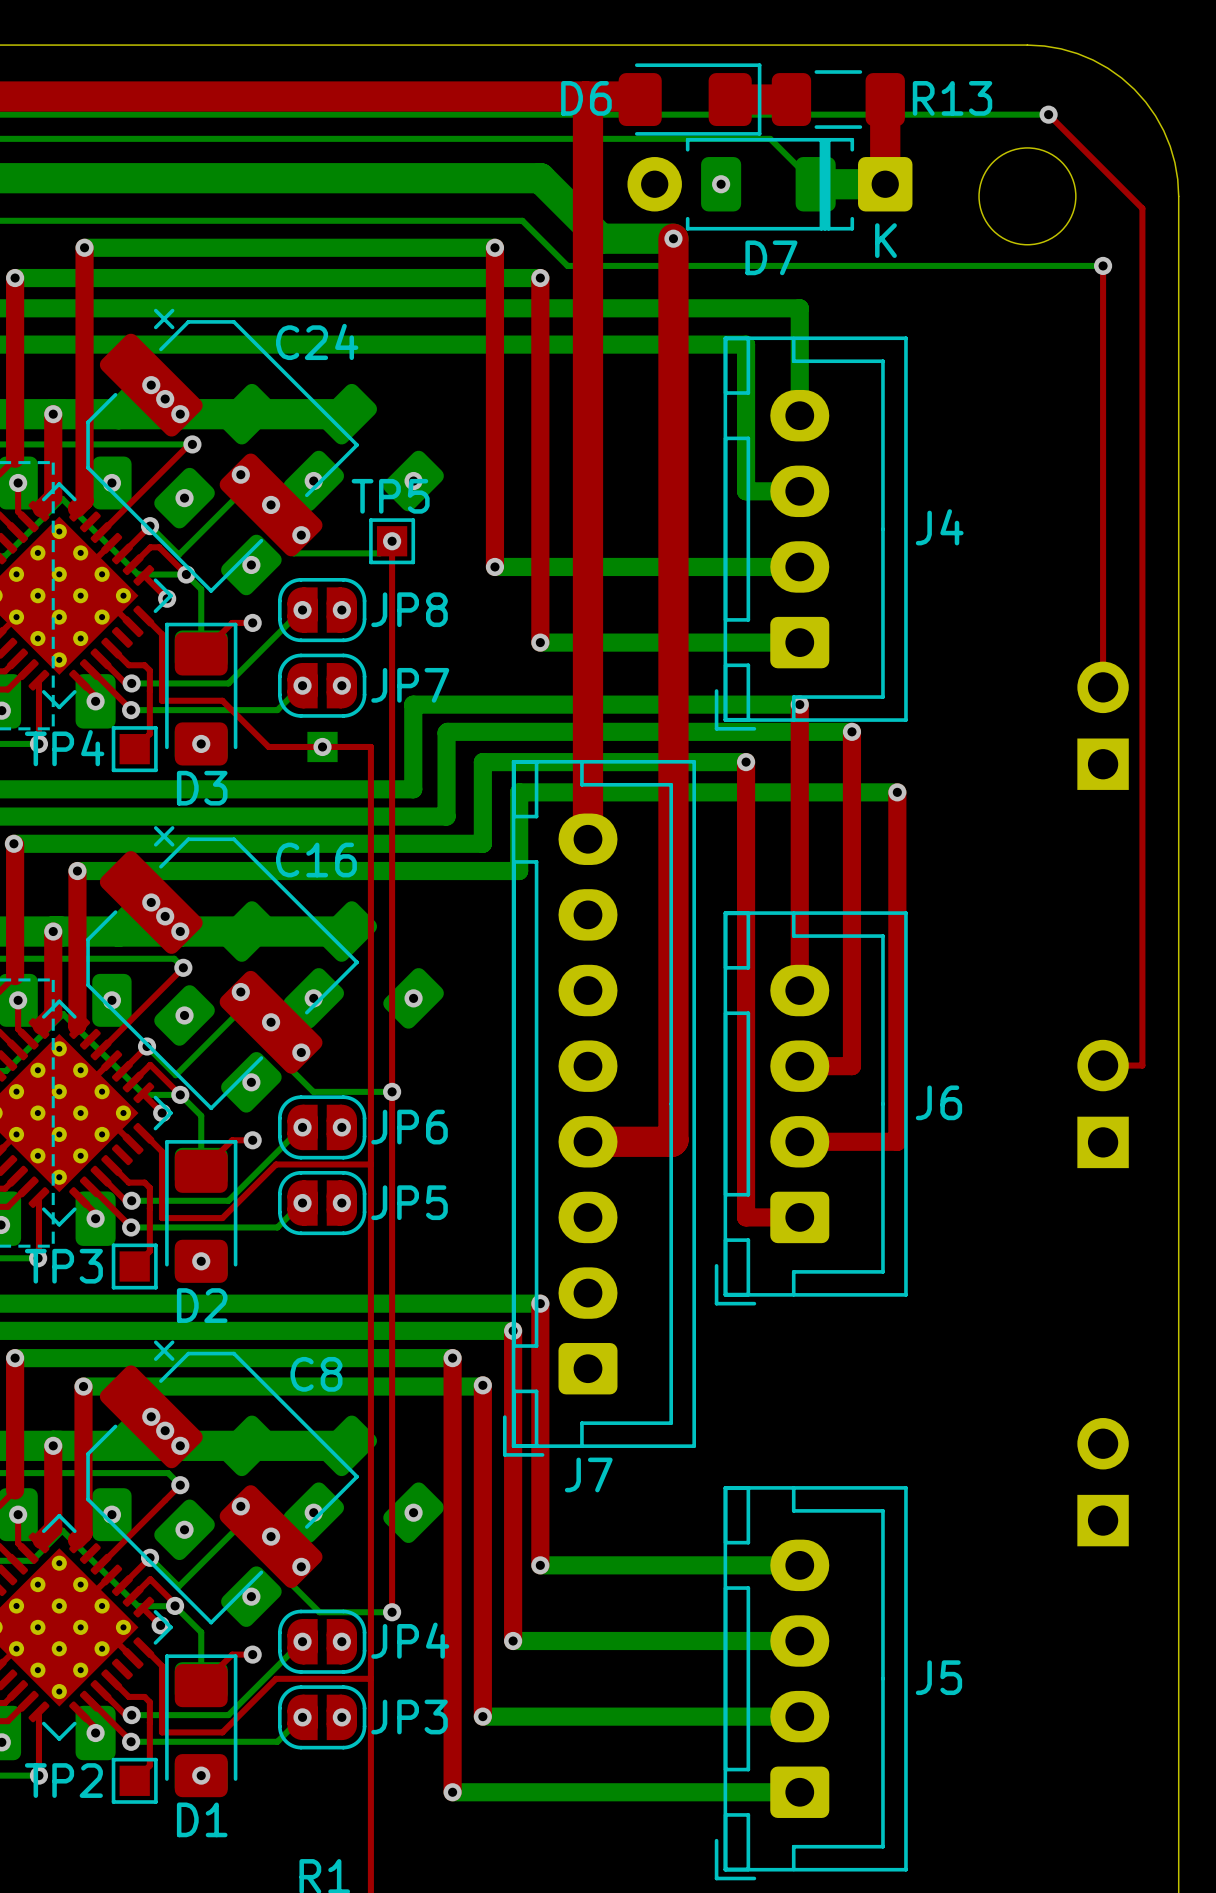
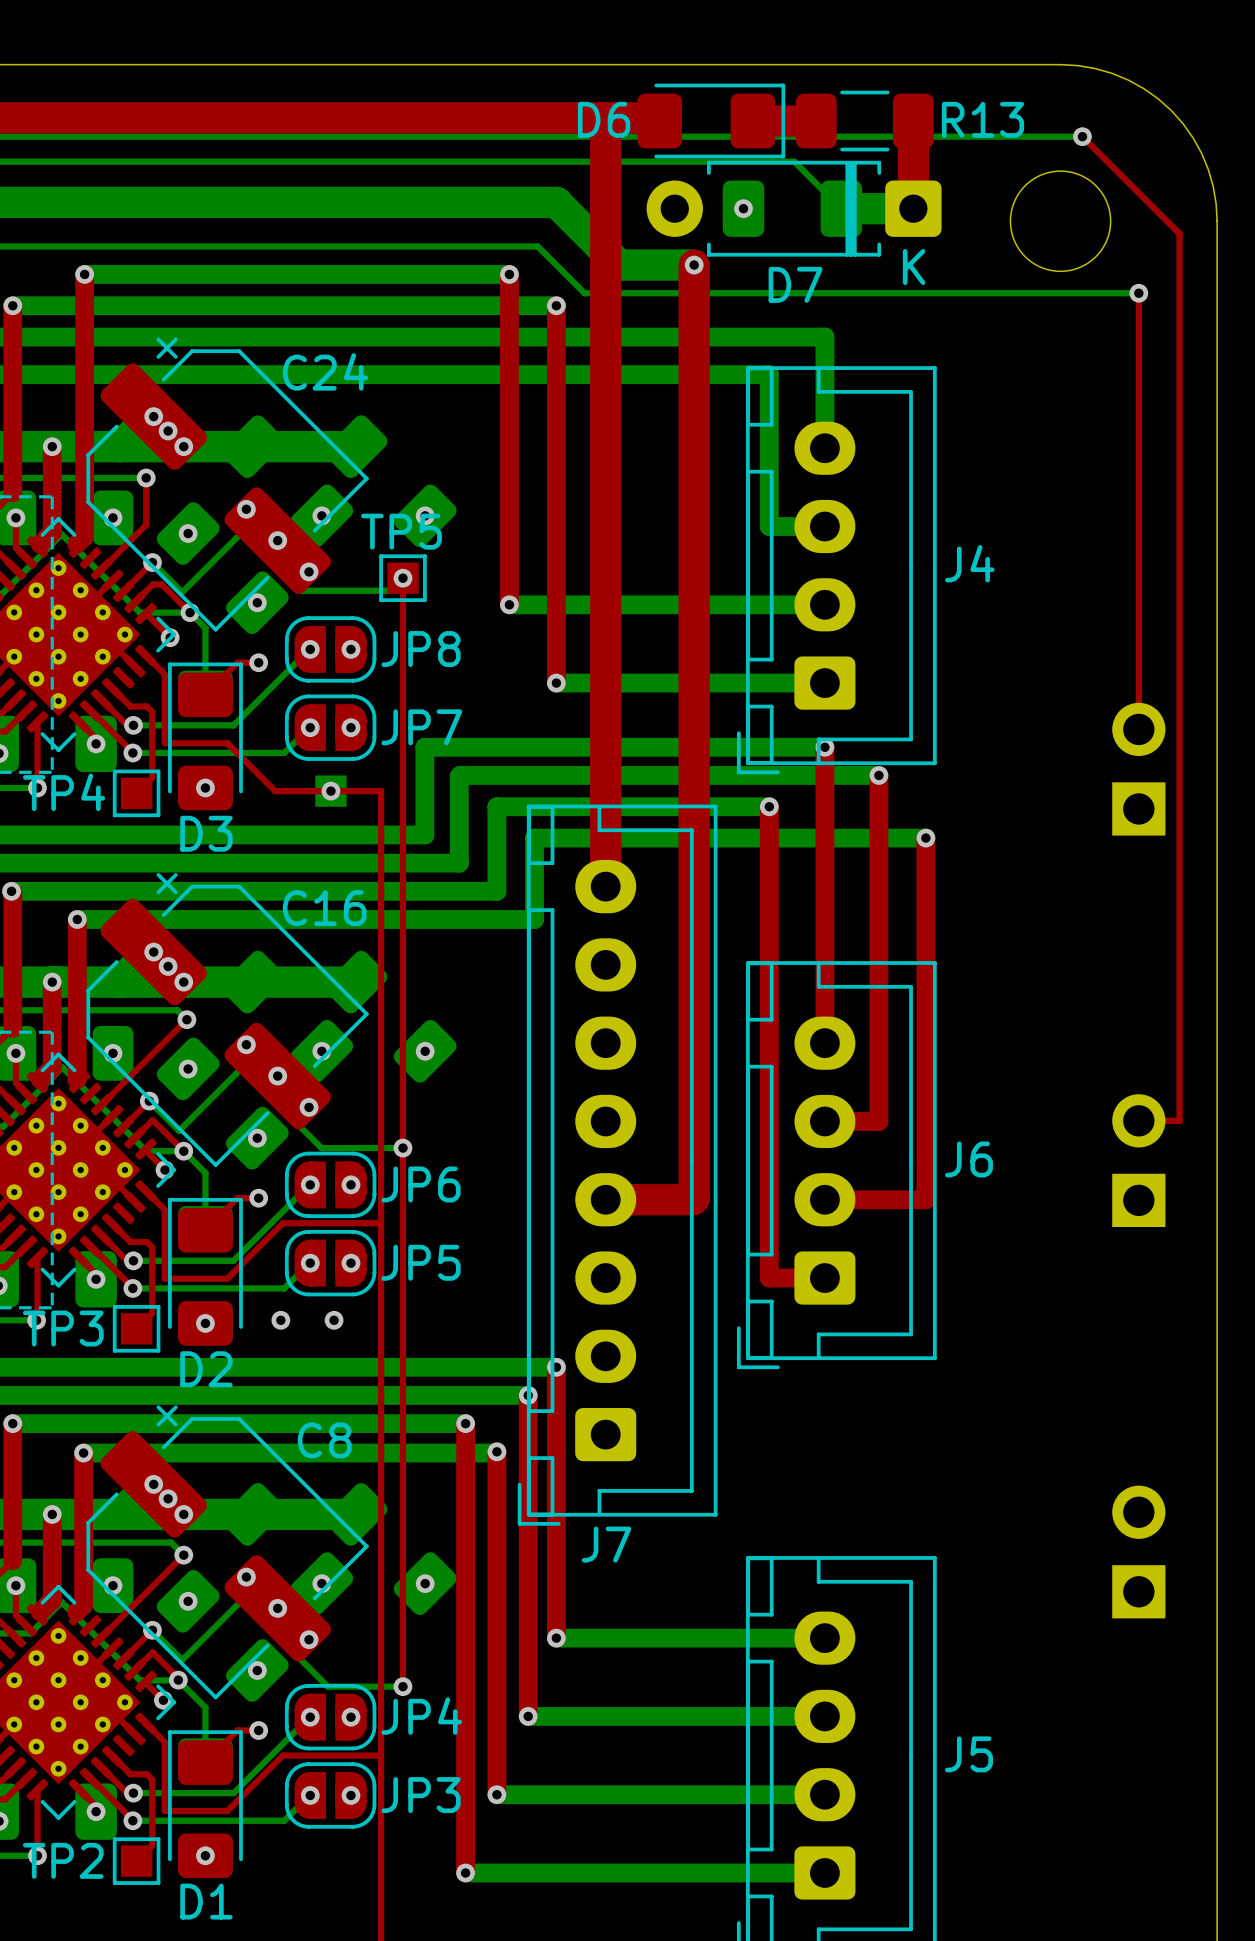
bottom track: (144, 444) (192, 444) -> none
top track: (192, 444) (189, 444) (144, 489) -> (146, 477) (146, 524)
via position: (192, 444) -> (146, 477)
via: none -> (280, 1320)
via: none -> (334, 1320)

